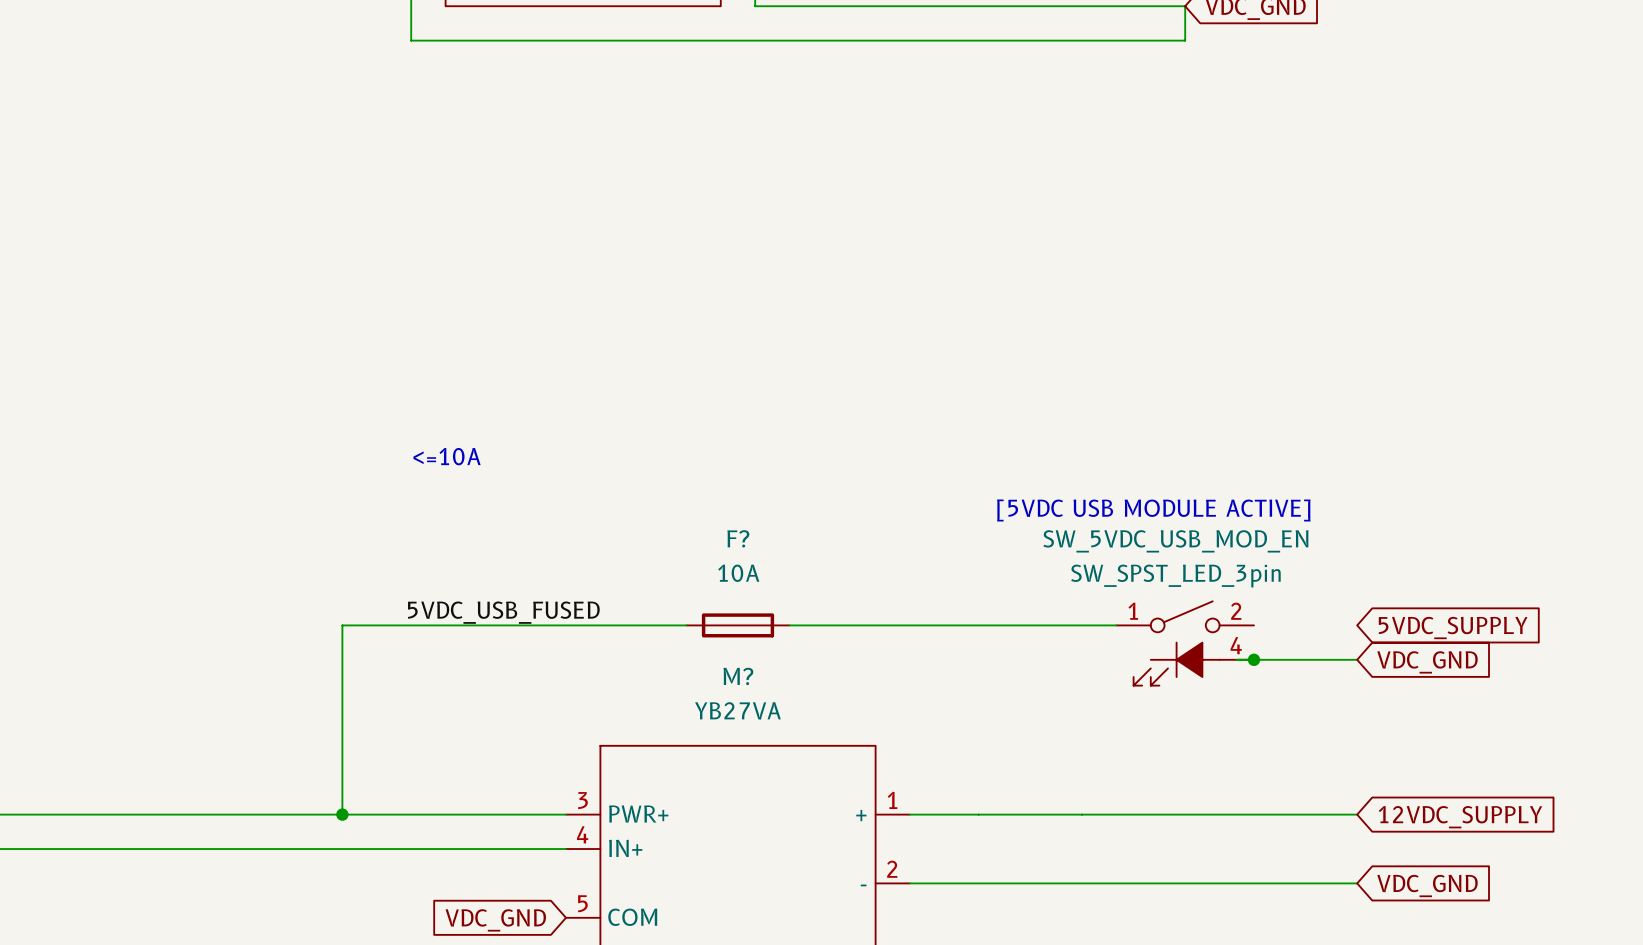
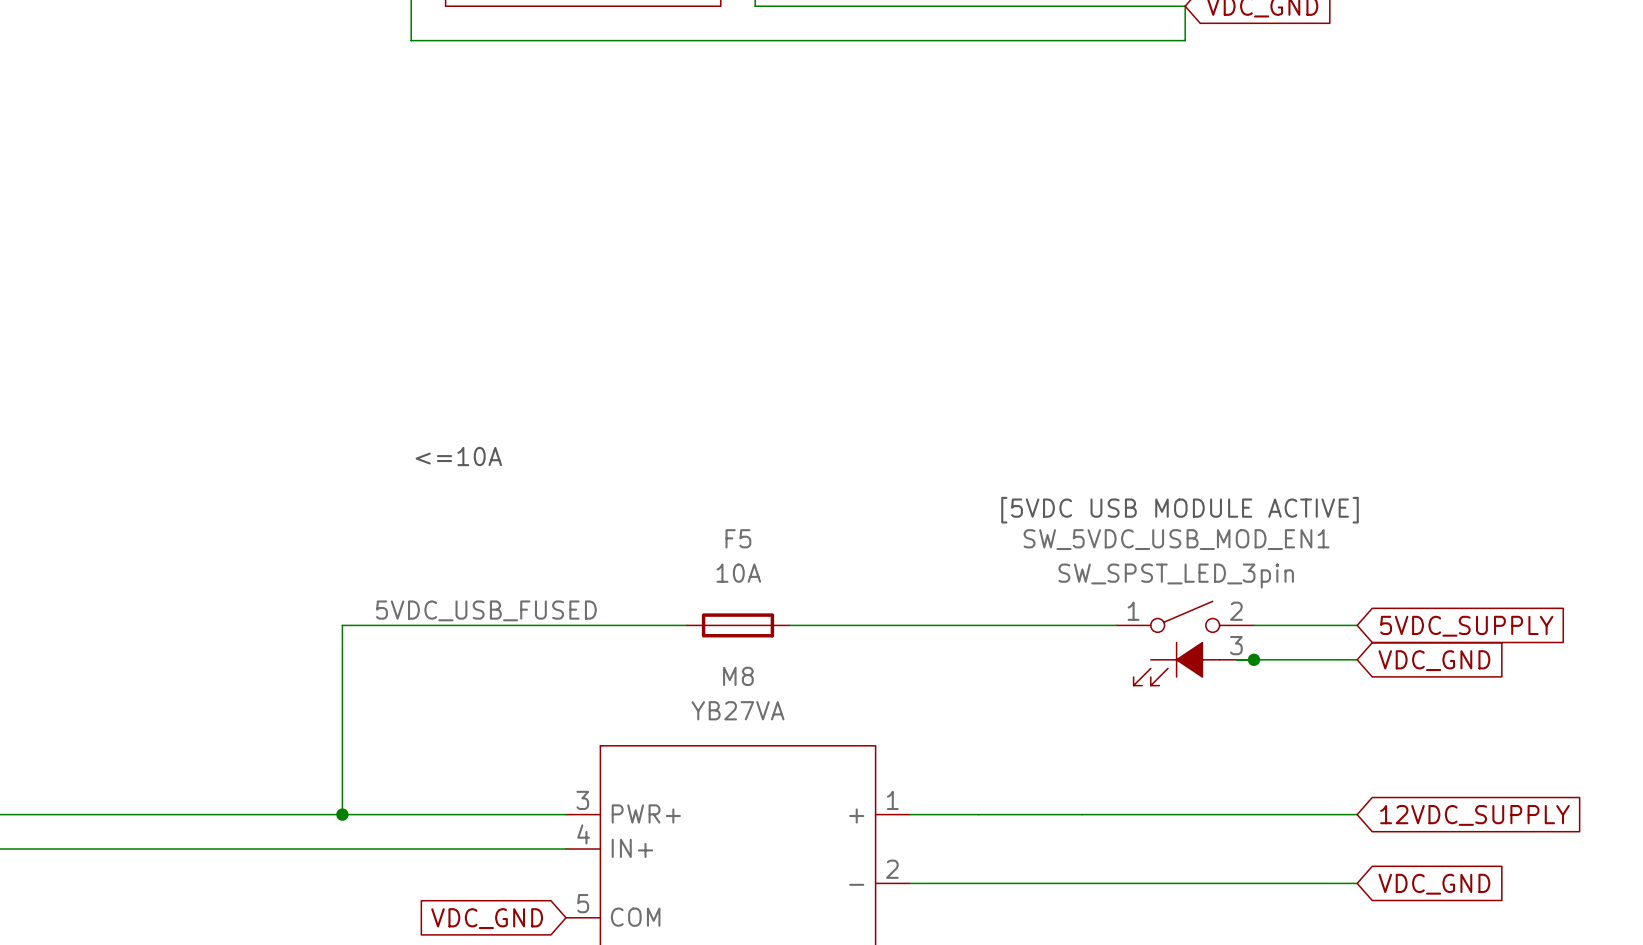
F? name: F? (738, 538) -> F5 (738, 538)
SW_5VDC_USB_MOD_EN name: SW_5VDC_USB_MOD_EN (1175, 541) -> SW_5VDC_USB_MOD_EN1 (1176, 539)
wire: none -> (1253, 625) (1357, 625)
SW_5VDC_USB_MOD_EN pin number: 4 (1236, 645) -> 3 (1236, 645)
M? name: M? (738, 676) -> M8 (738, 676)

